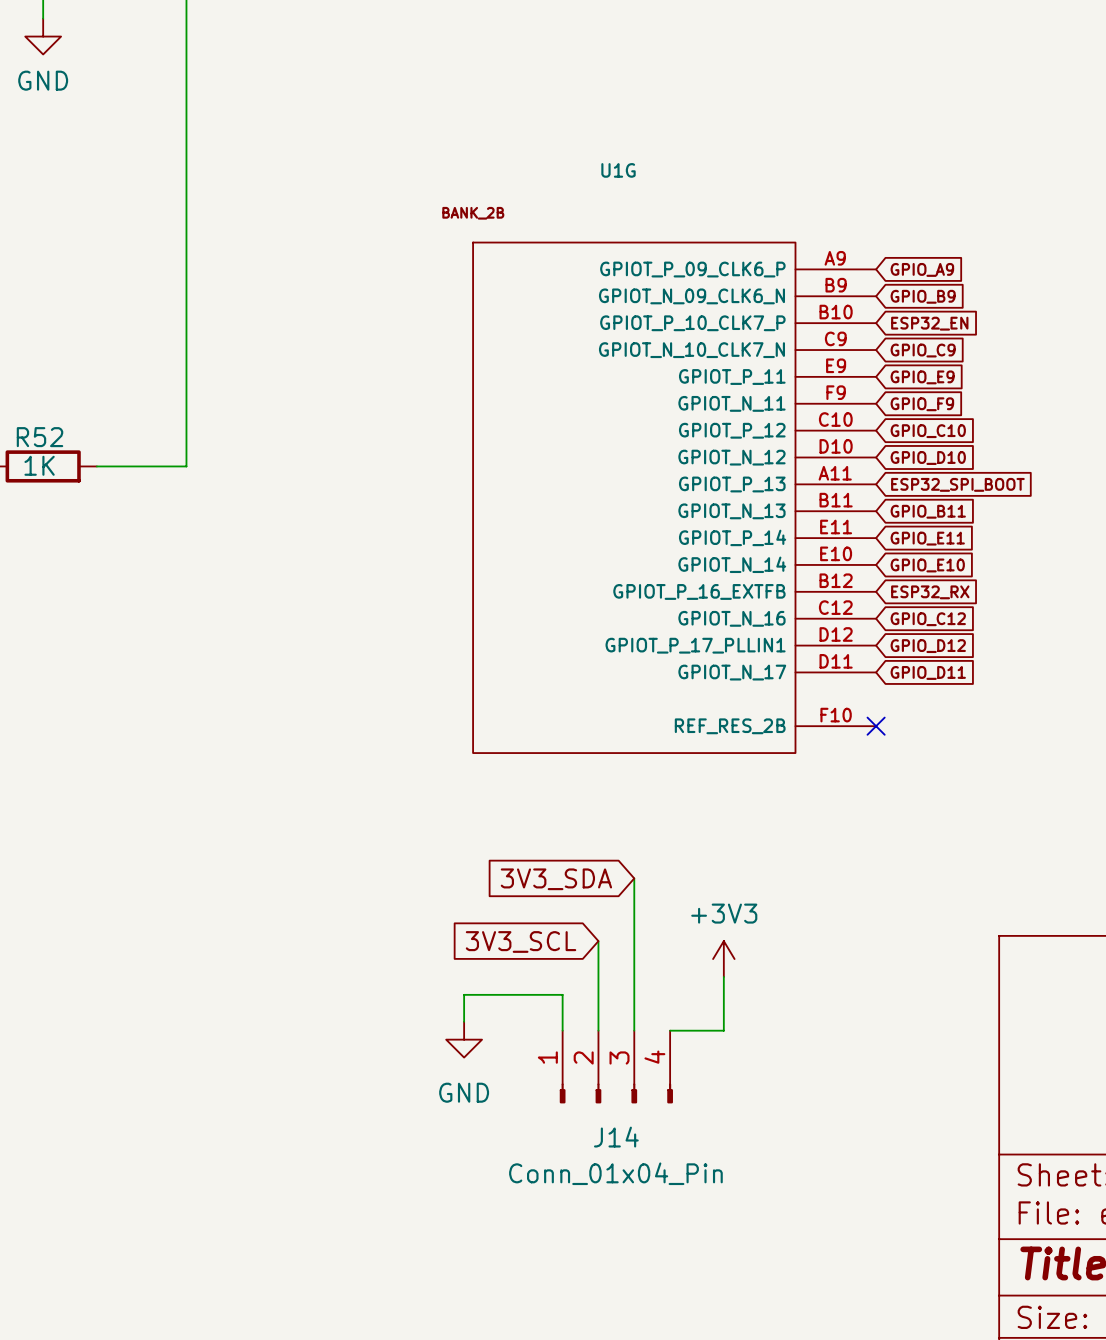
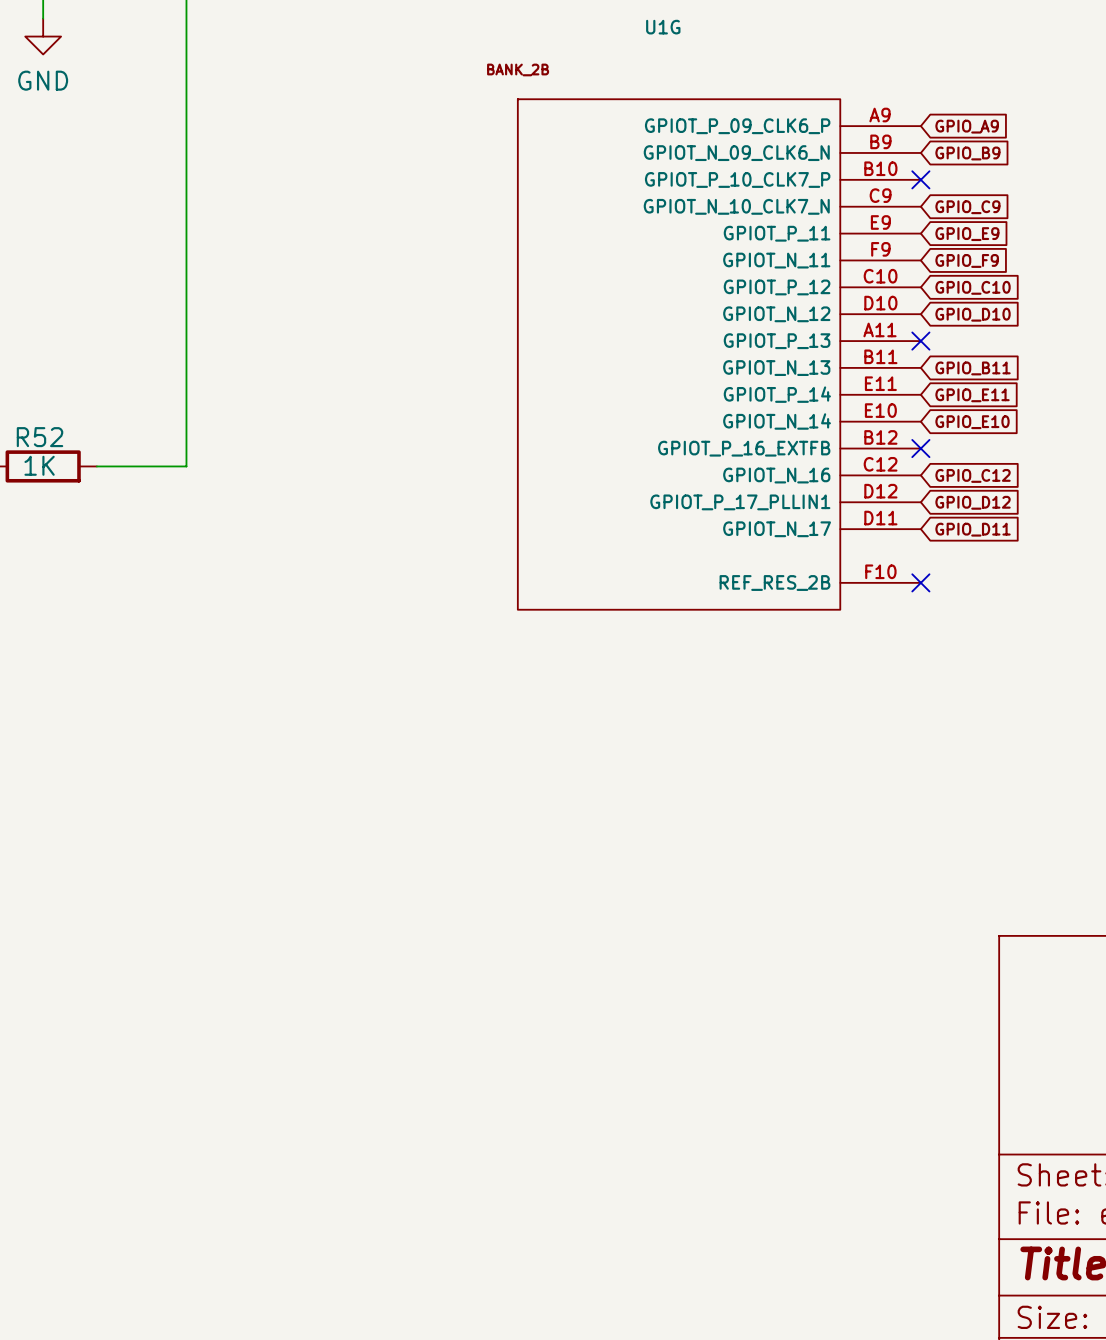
no-connect mark: none -> (920, 179)
global label position: GPIO_A9 (922, 269) -> GPIO_A9 (967, 126)
global label position: GPIO_B9 (923, 296) -> GPIO_B9 (967, 153)
global label: ESP32_EN (929, 323) -> none
no-connect mark: none -> (920, 341)
global label position: GPIO_C9 (923, 350) -> GPIO_C9 (967, 207)
global label position: GPIO_E9 (922, 377) -> GPIO_E9 (967, 234)
global label position: GPIO_F9 (922, 404) -> GPIO_F9 (967, 260)
global label position: GPIO_C10 (928, 431) -> GPIO_C10 (973, 287)
no-connect mark: none -> (920, 448)
global label position: GPIO_D10 (928, 458) -> GPIO_D10 (973, 314)
global label: ESP32_SPI_BOOT (957, 484) -> none
U1G position: (674, 497) -> (719, 354)
global label position: GPIO_B11 (928, 511) -> GPIO_B11 (973, 368)
global label position: GPIO_E11 (927, 538) -> GPIO_E11 (972, 395)
global label position: GPIO_E10 (927, 565) -> GPIO_E10 (972, 422)
no-connect mark: none -> (920, 582)
global label: ESP32_RX (930, 592) -> none
global label position: GPIO_C12 (928, 619) -> GPIO_C12 (973, 475)
global label position: GPIO_D12 (928, 646) -> GPIO_D12 (973, 502)
global label position: GPIO_D11 (928, 672) -> GPIO_D11 (973, 529)
no-connect mark: (876, 726) -> none
wire: (634, 878) (634, 1030) -> none
global label: 3V3_SDA (556, 879) -> none
global label: 3V3_SCL (521, 941) -> none
wire: (598, 941) (598, 1030) -> none
power symbol: +3V3 (723, 959) -> none
wire: (723, 976) (723, 1030) (670, 1030) -> none
wire: (464, 1021) (464, 994) (562, 994) (562, 1030) -> none
power symbol: GND (464, 1039) -> none
J14: Conn_01x04_Pin (616, 1067) -> none

